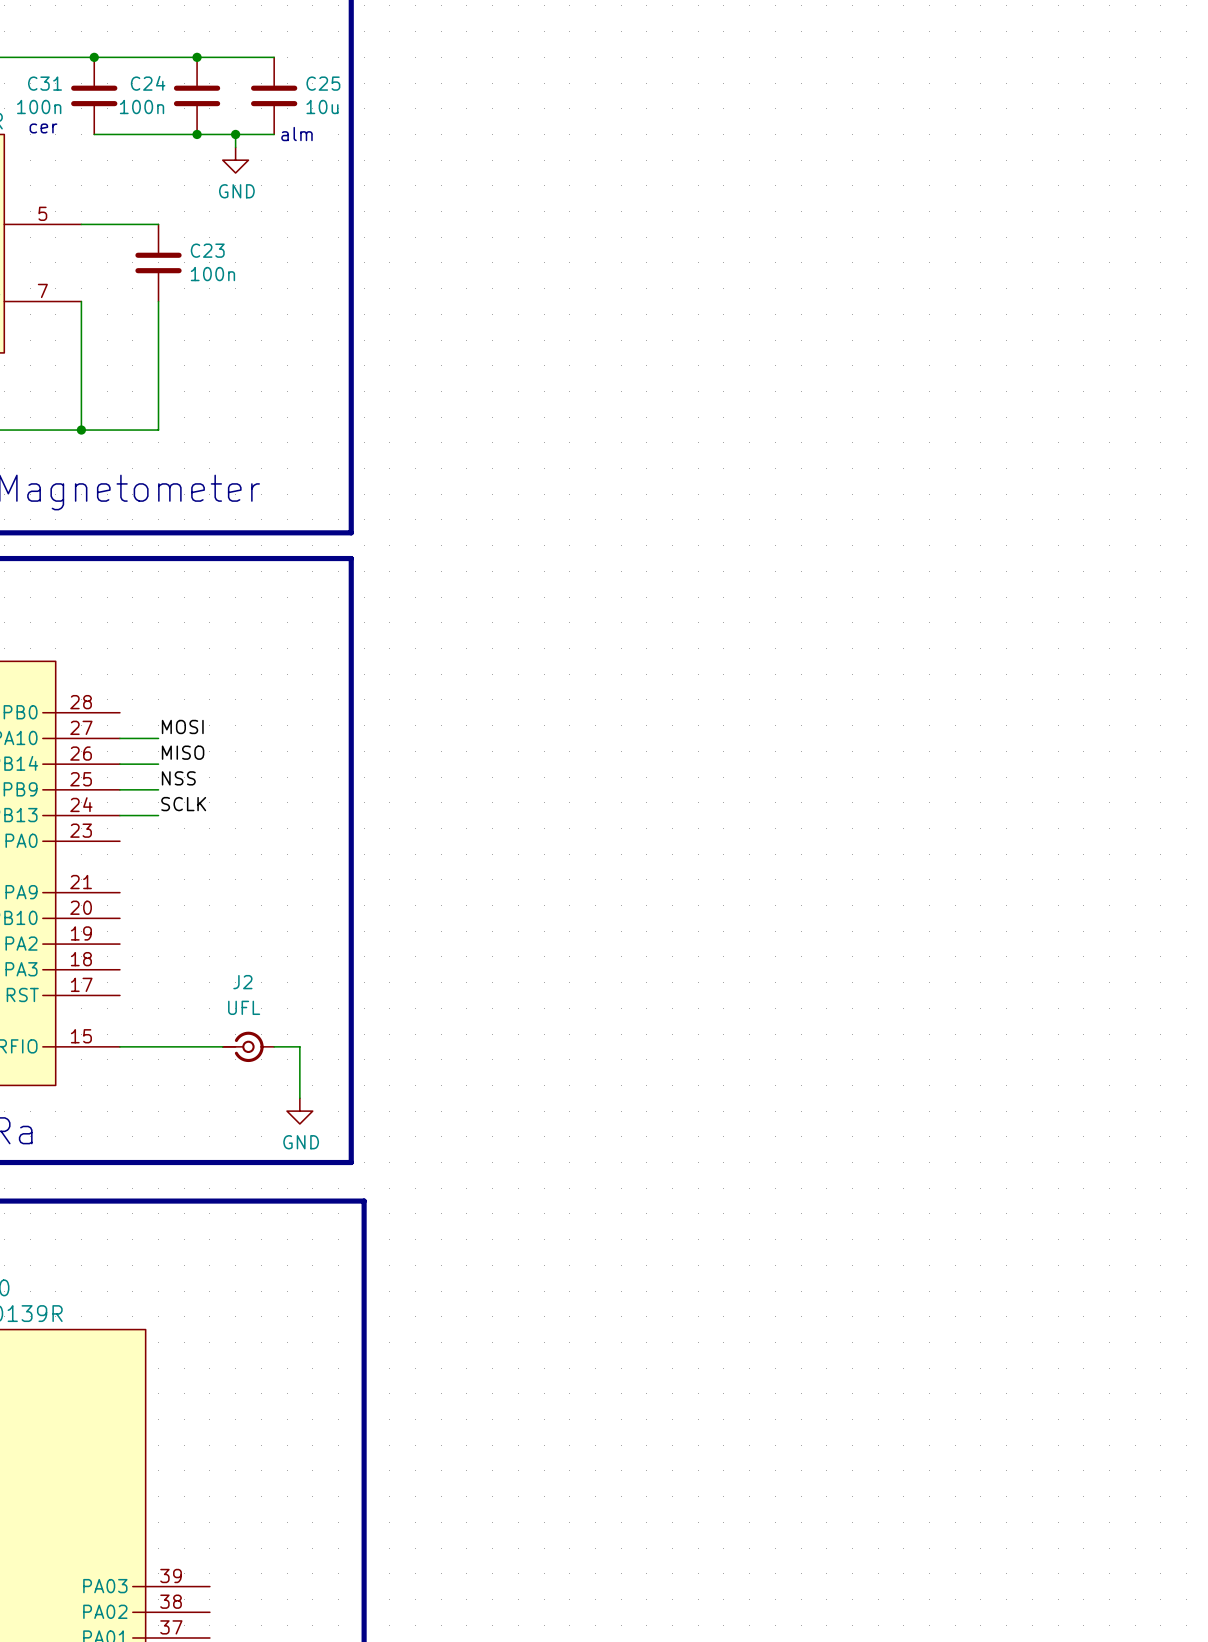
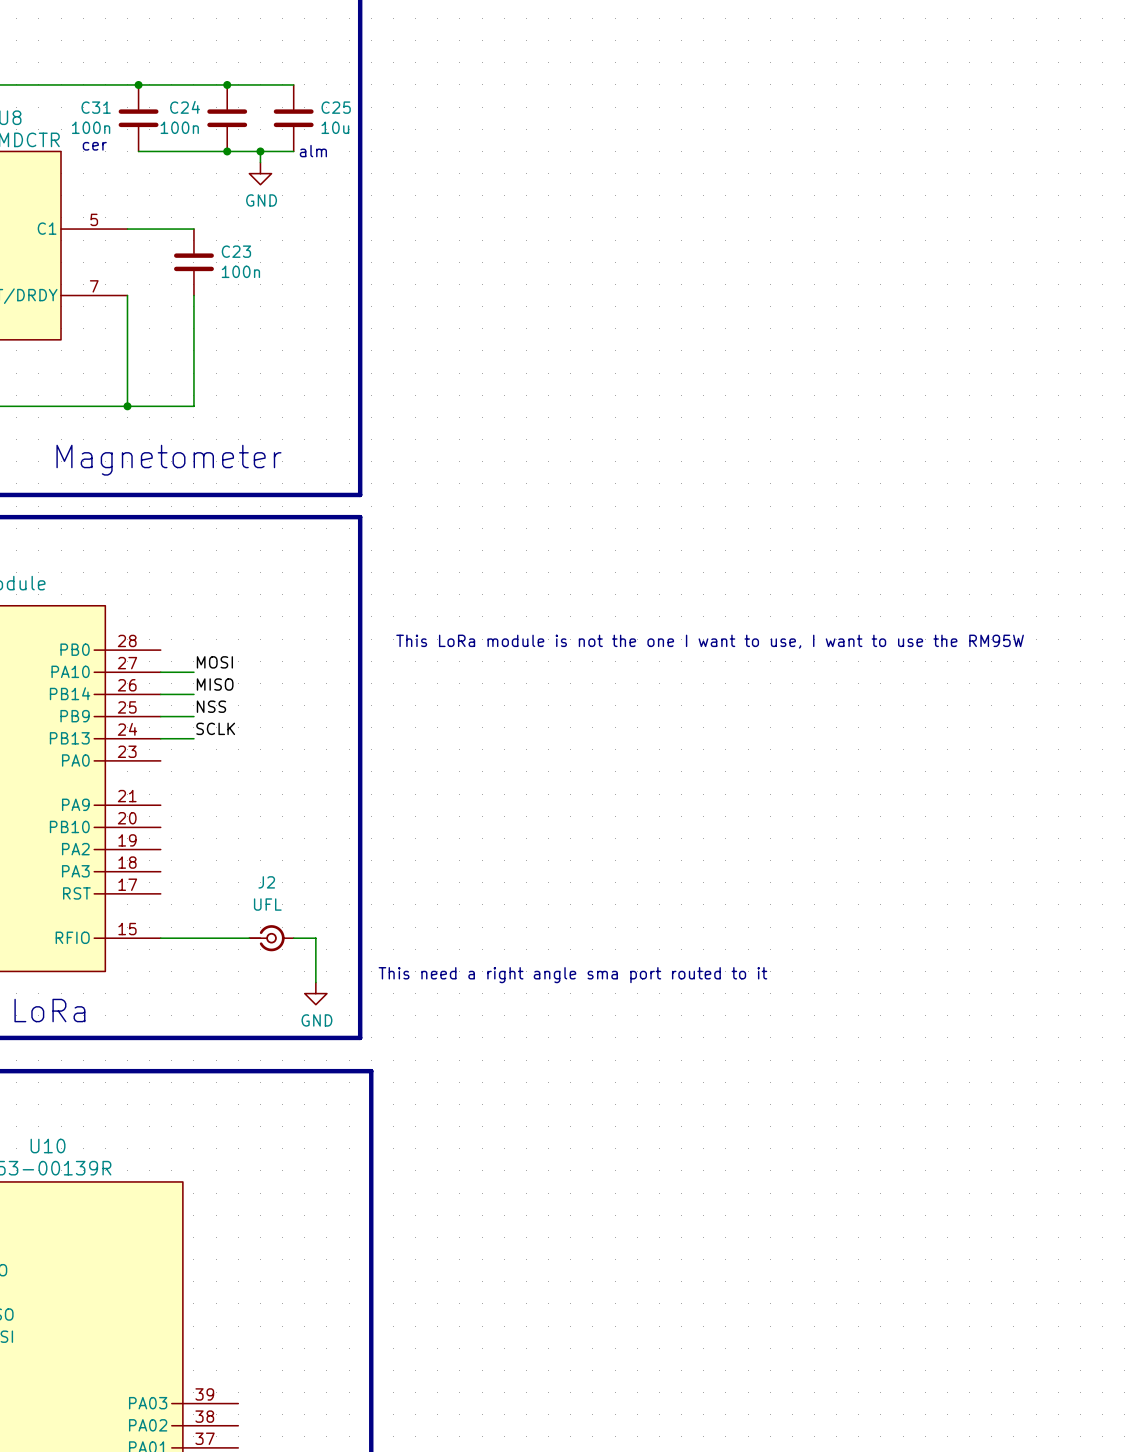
text: none -> This LoRa module is not the one I want to use, I want to use the RM95W (710, 641)
text: none -> This need a right angle sma port routed to it (572, 975)

